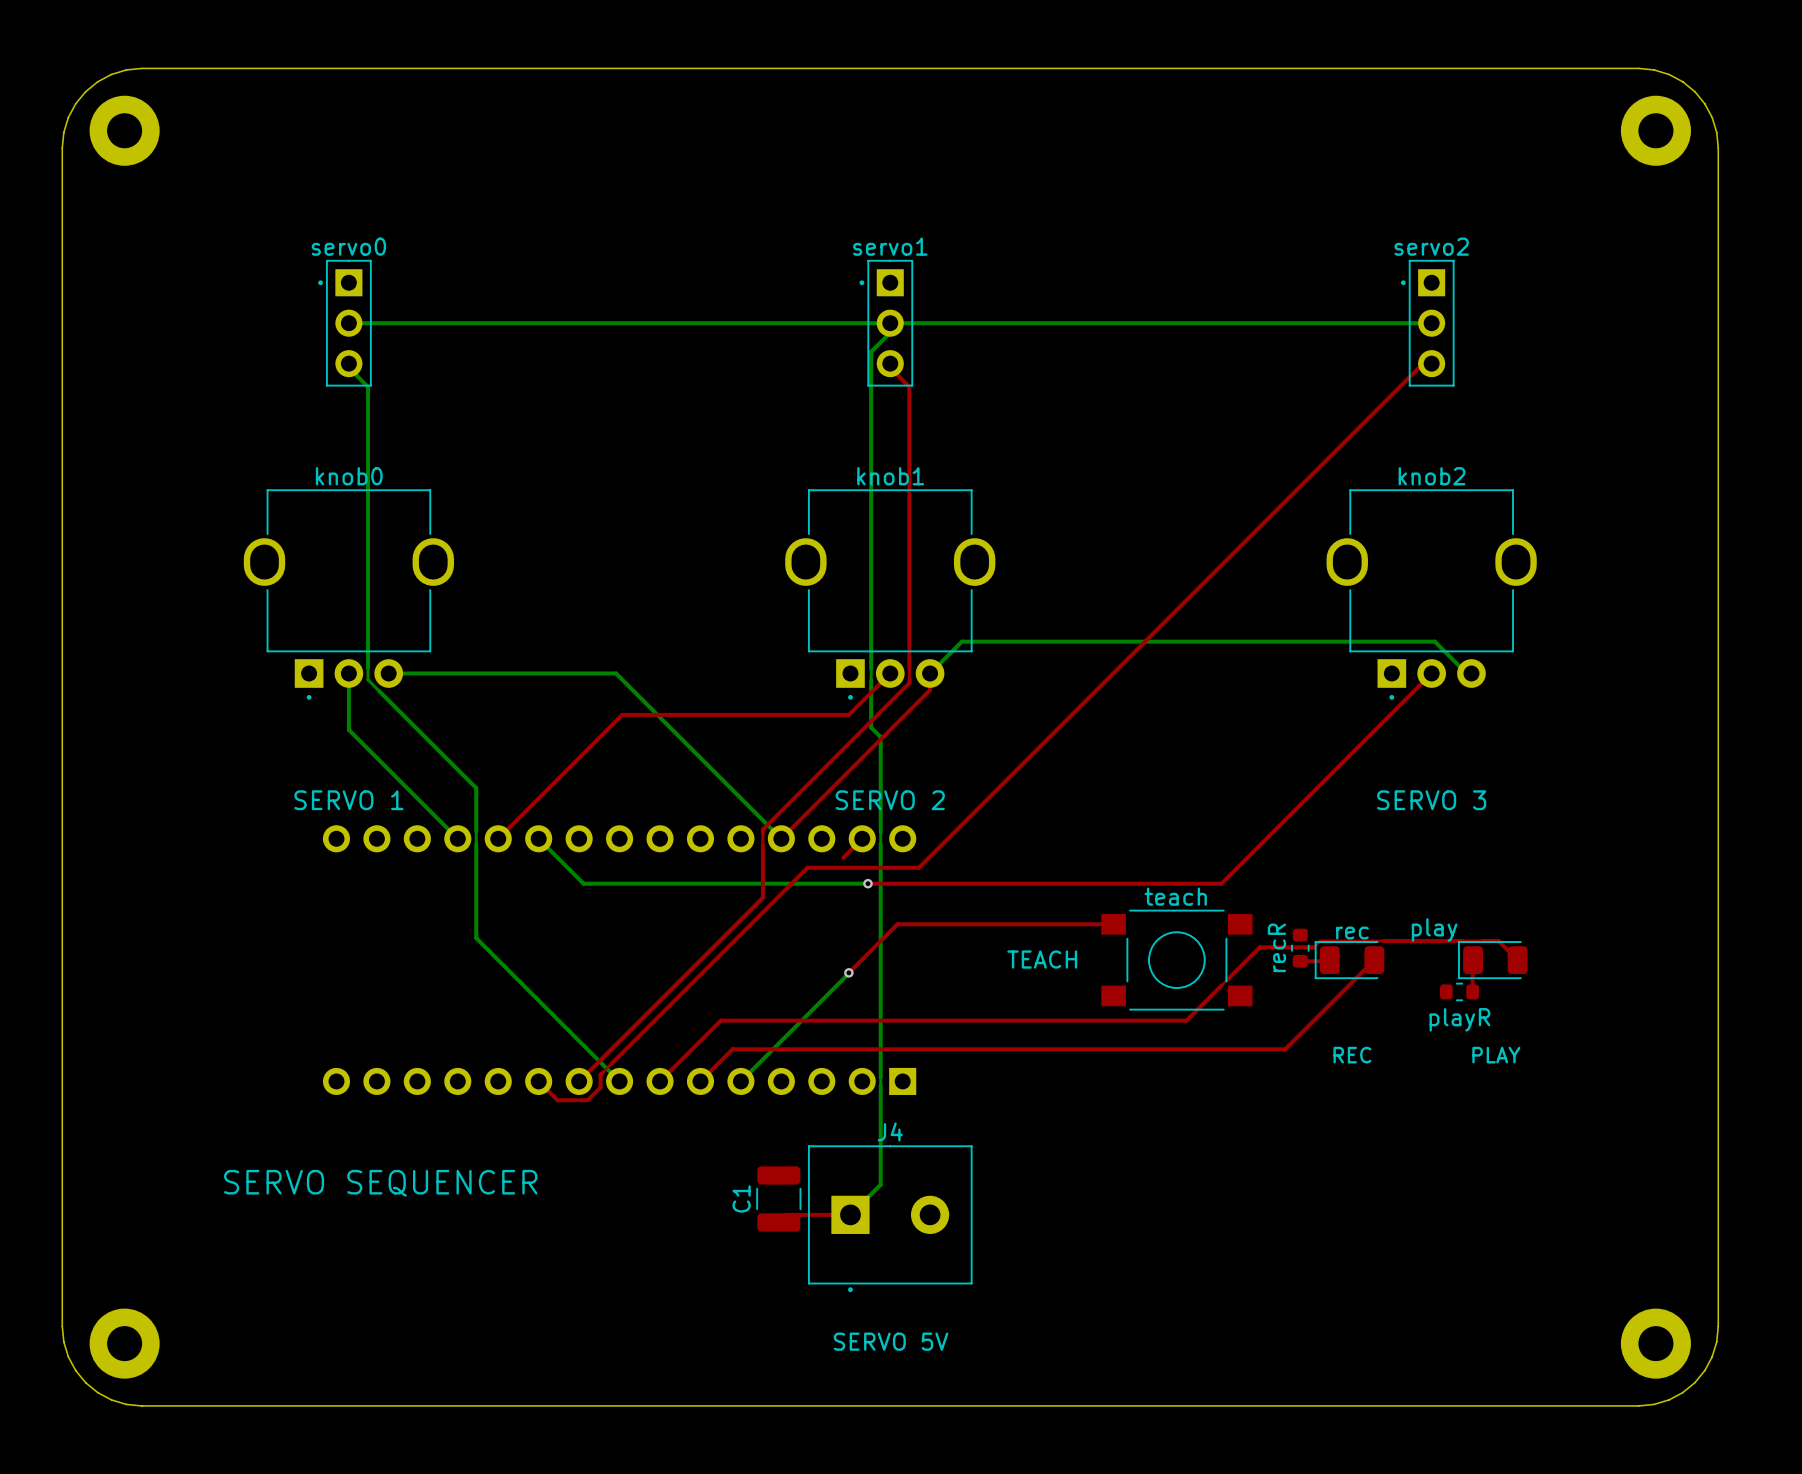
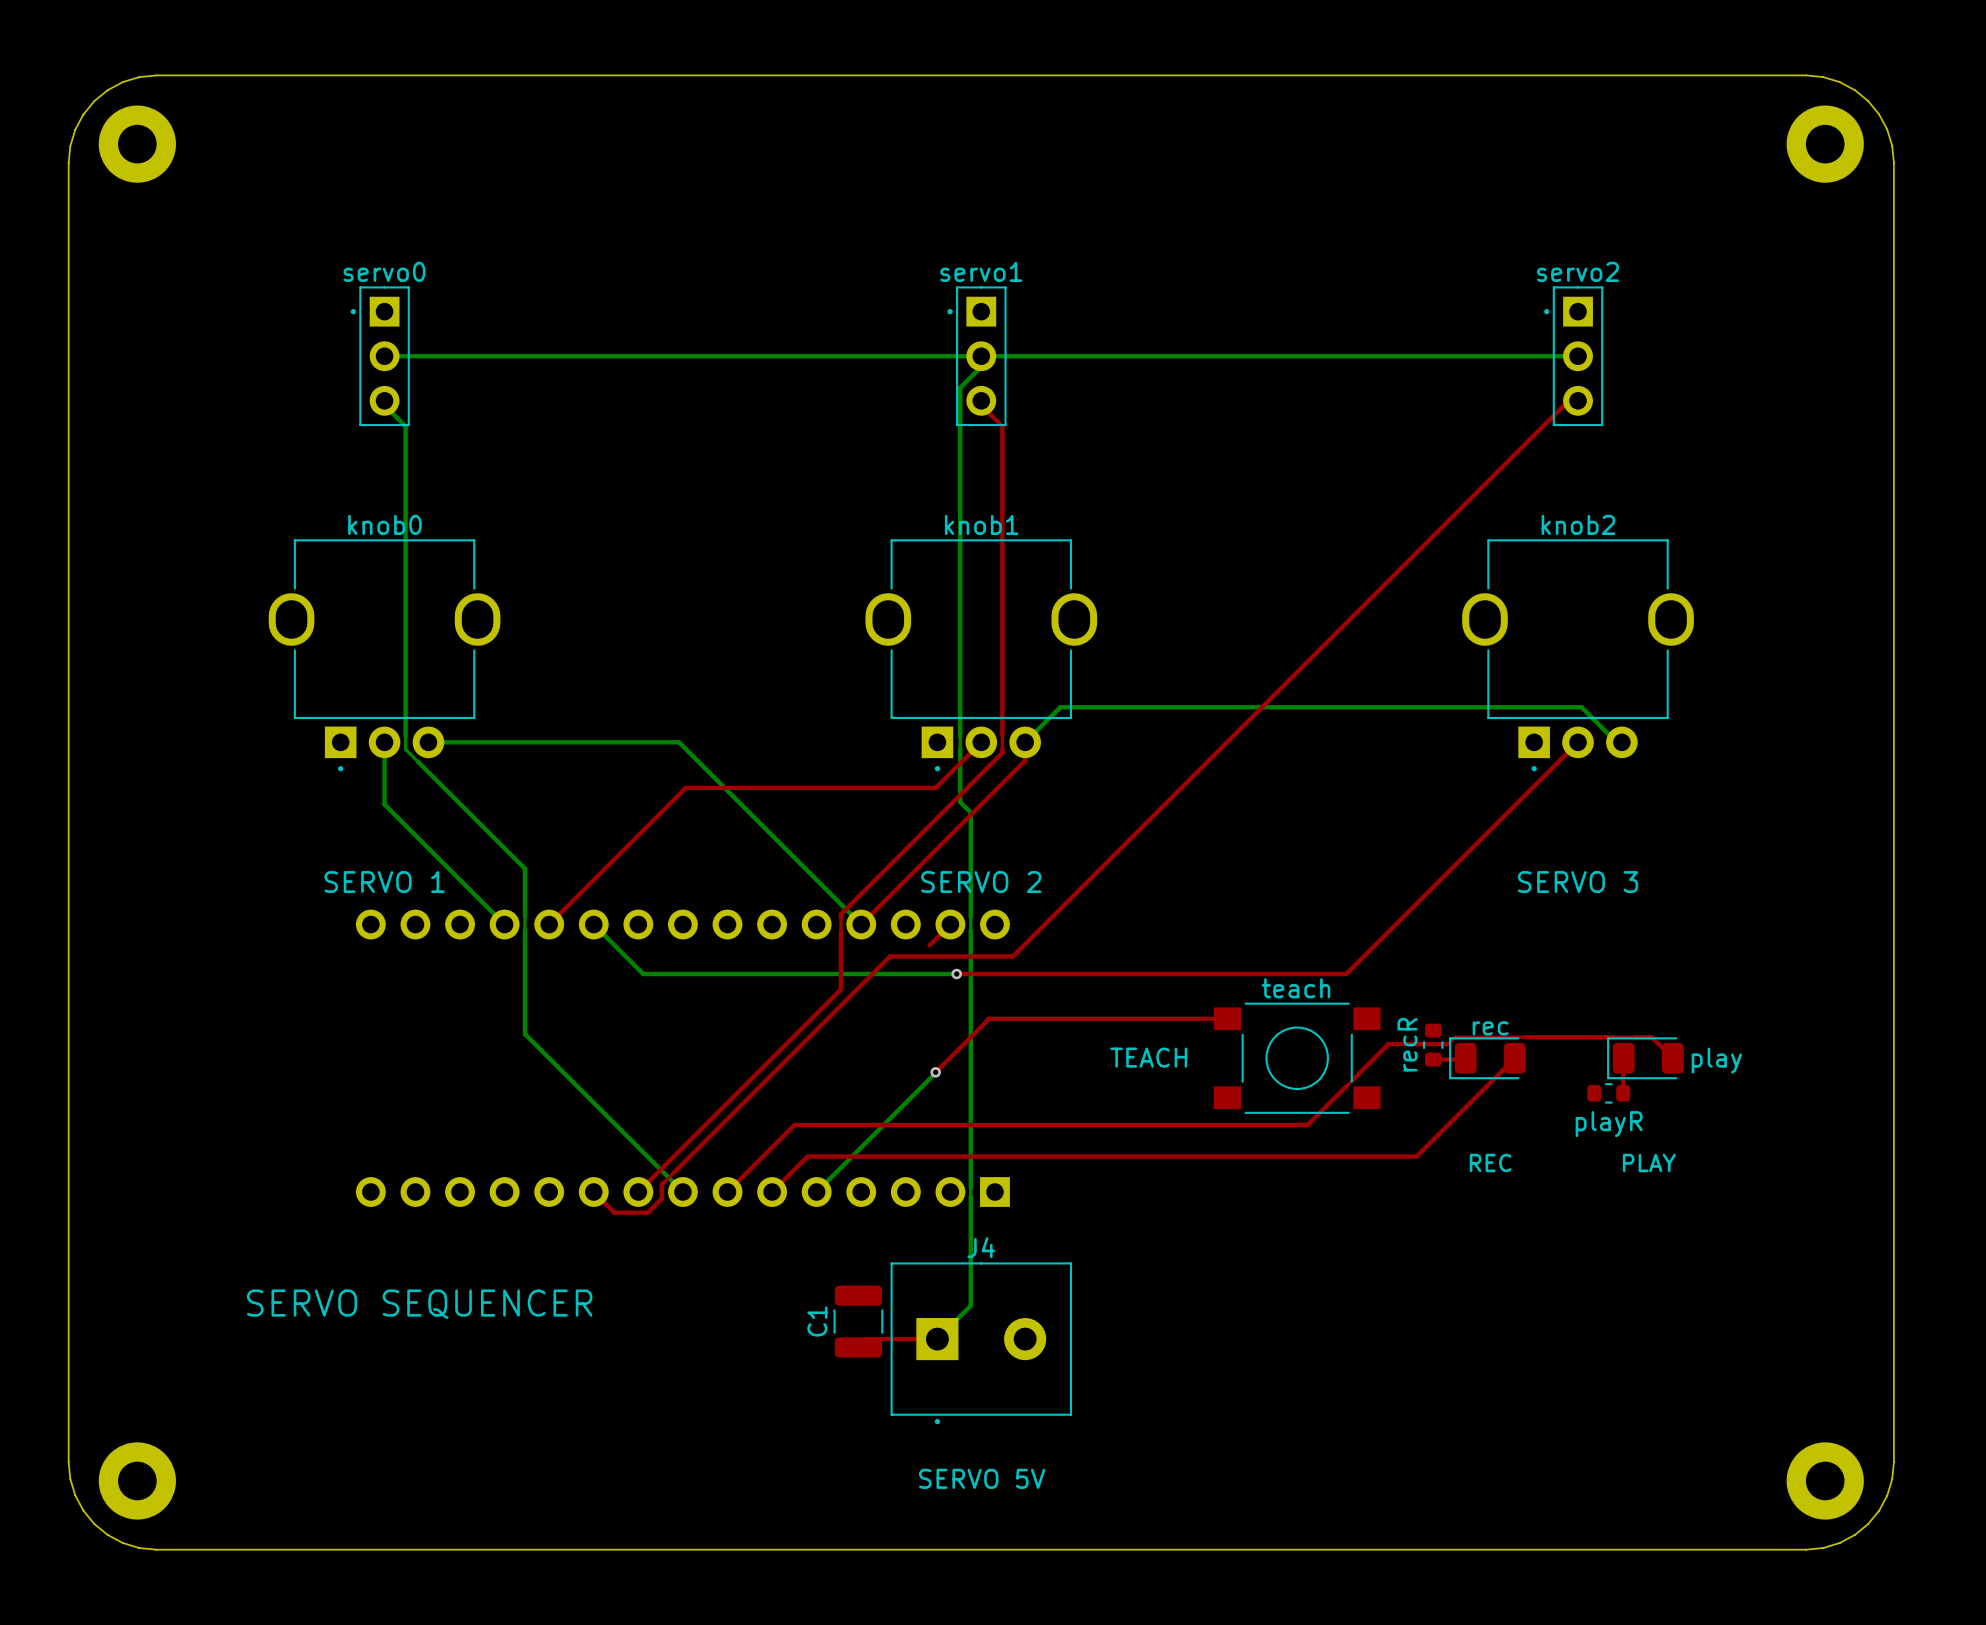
play name position: play (1434, 929) -> play (1716, 1060)

